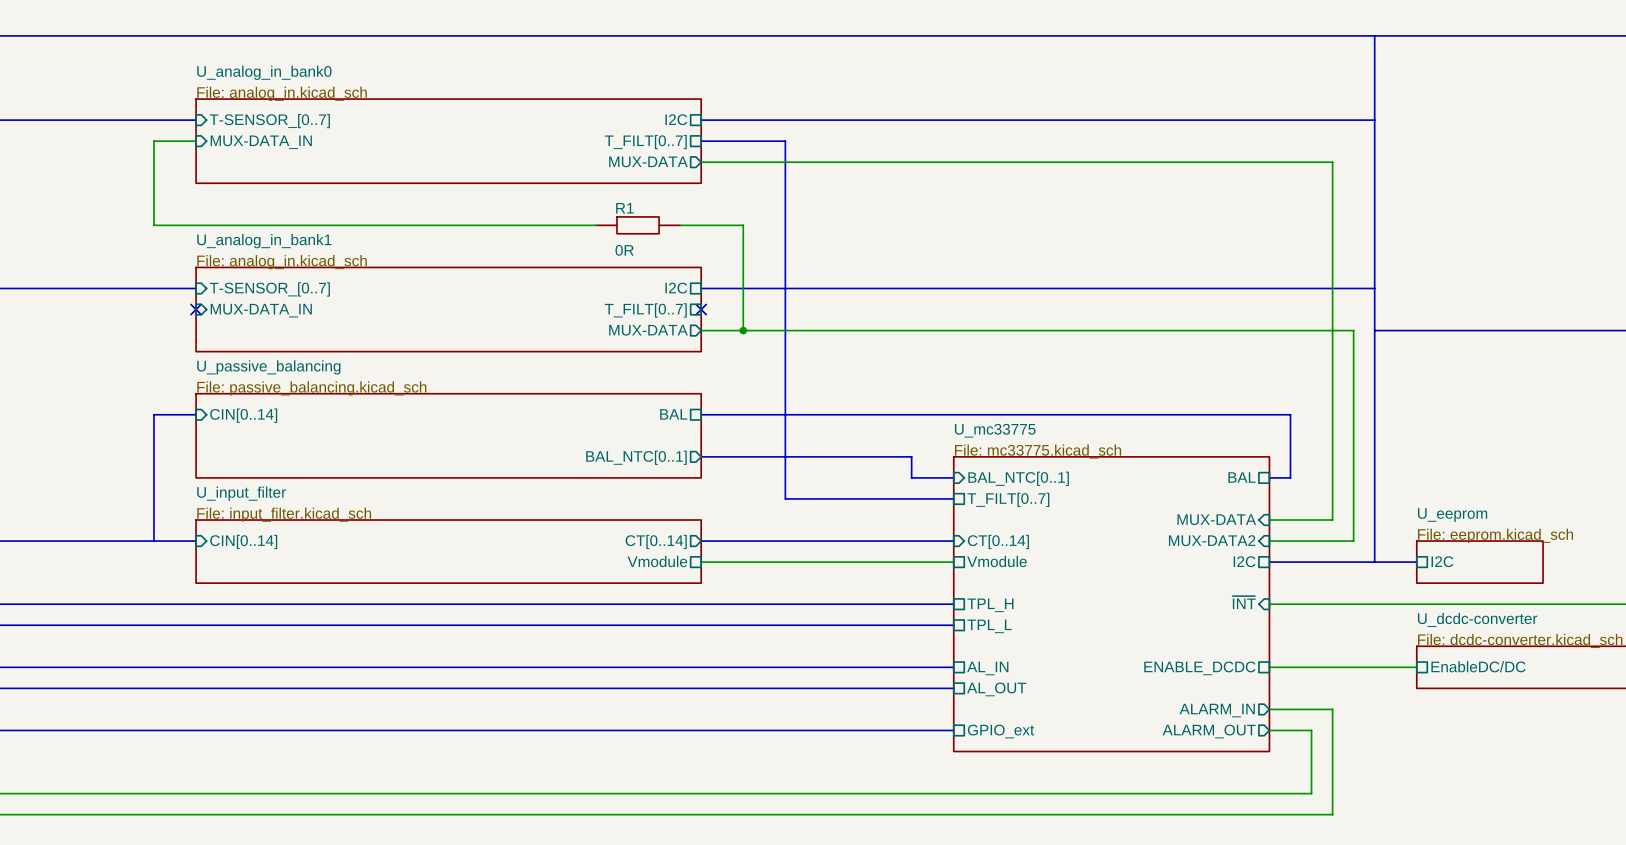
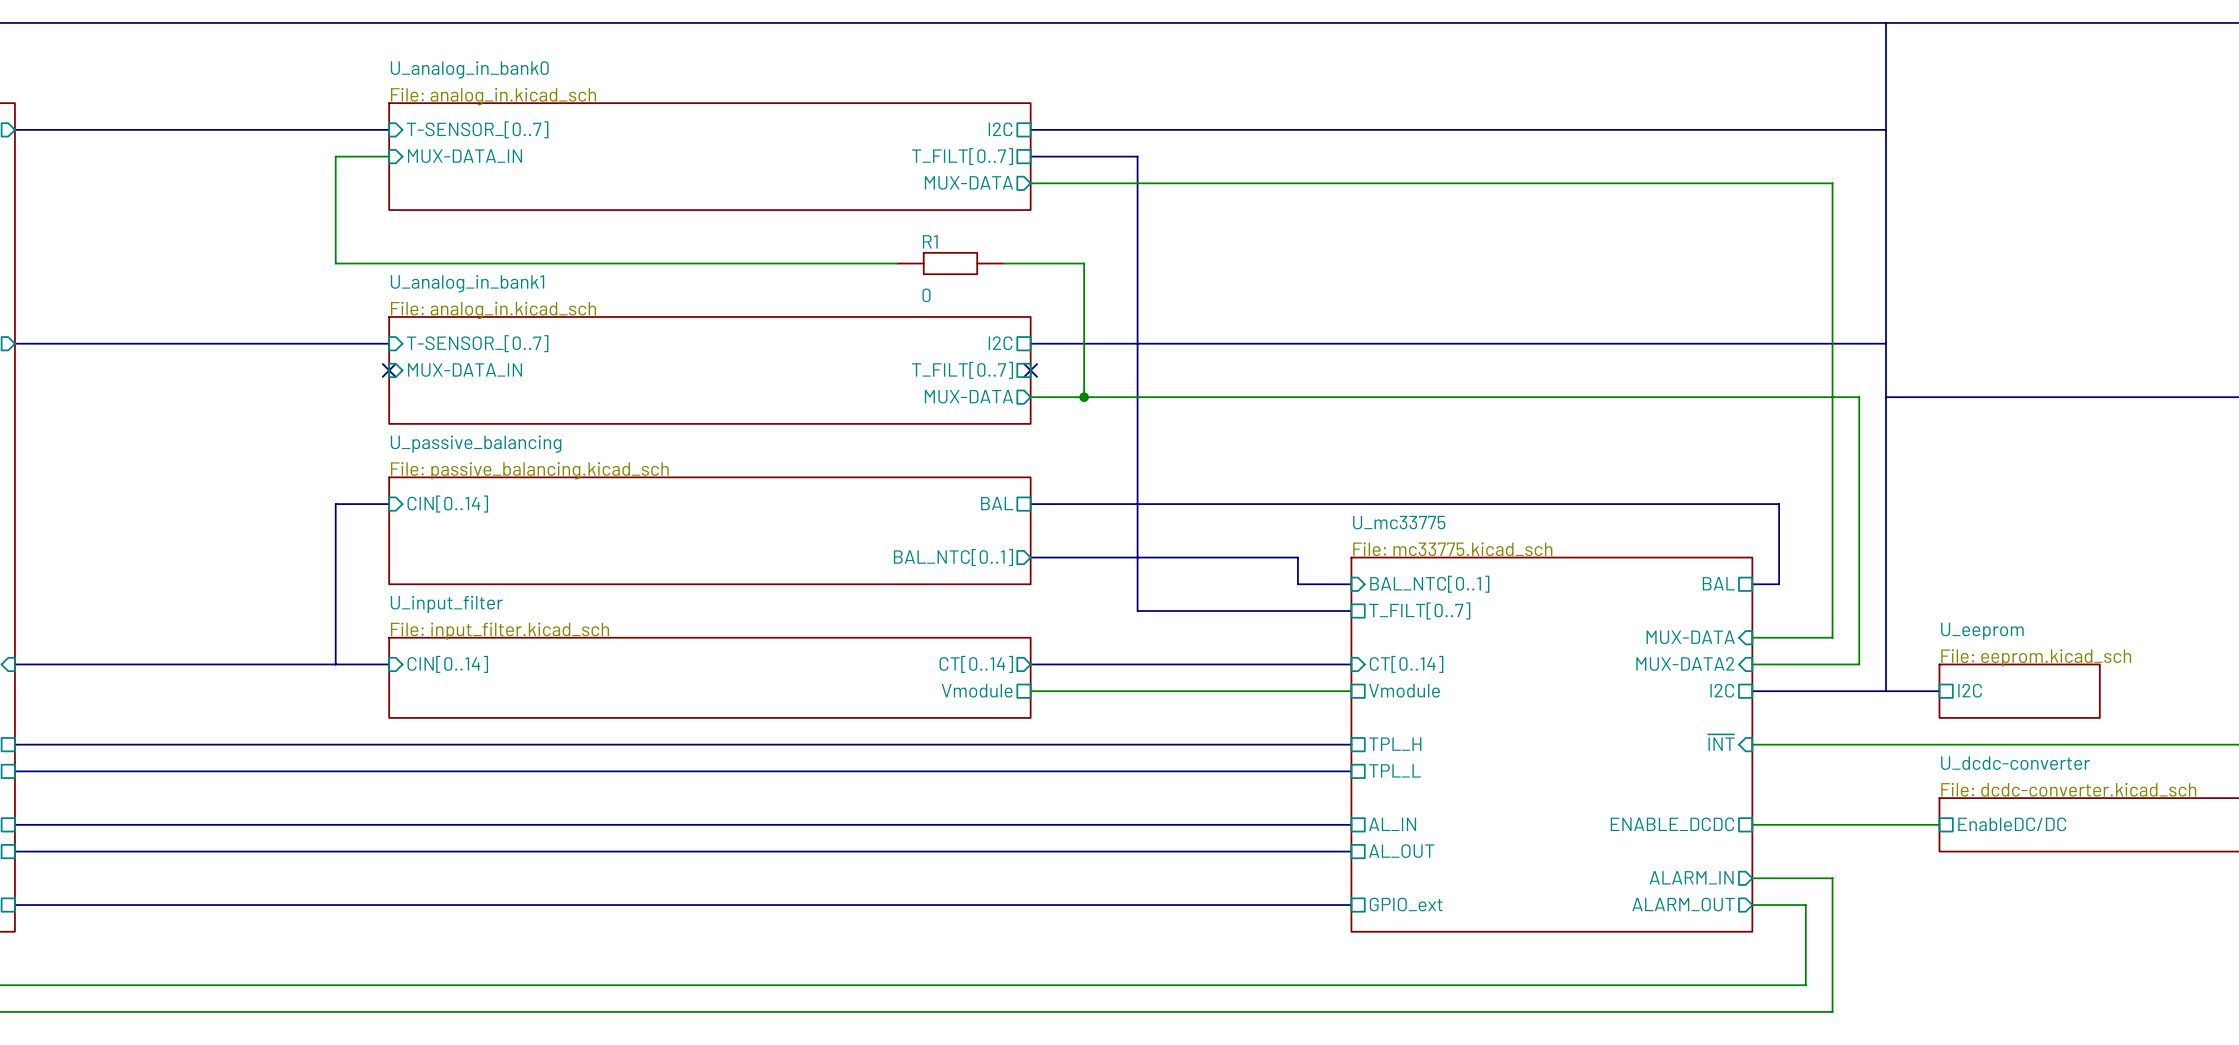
R1 value: 0R (624, 250) -> 0 (926, 295)

